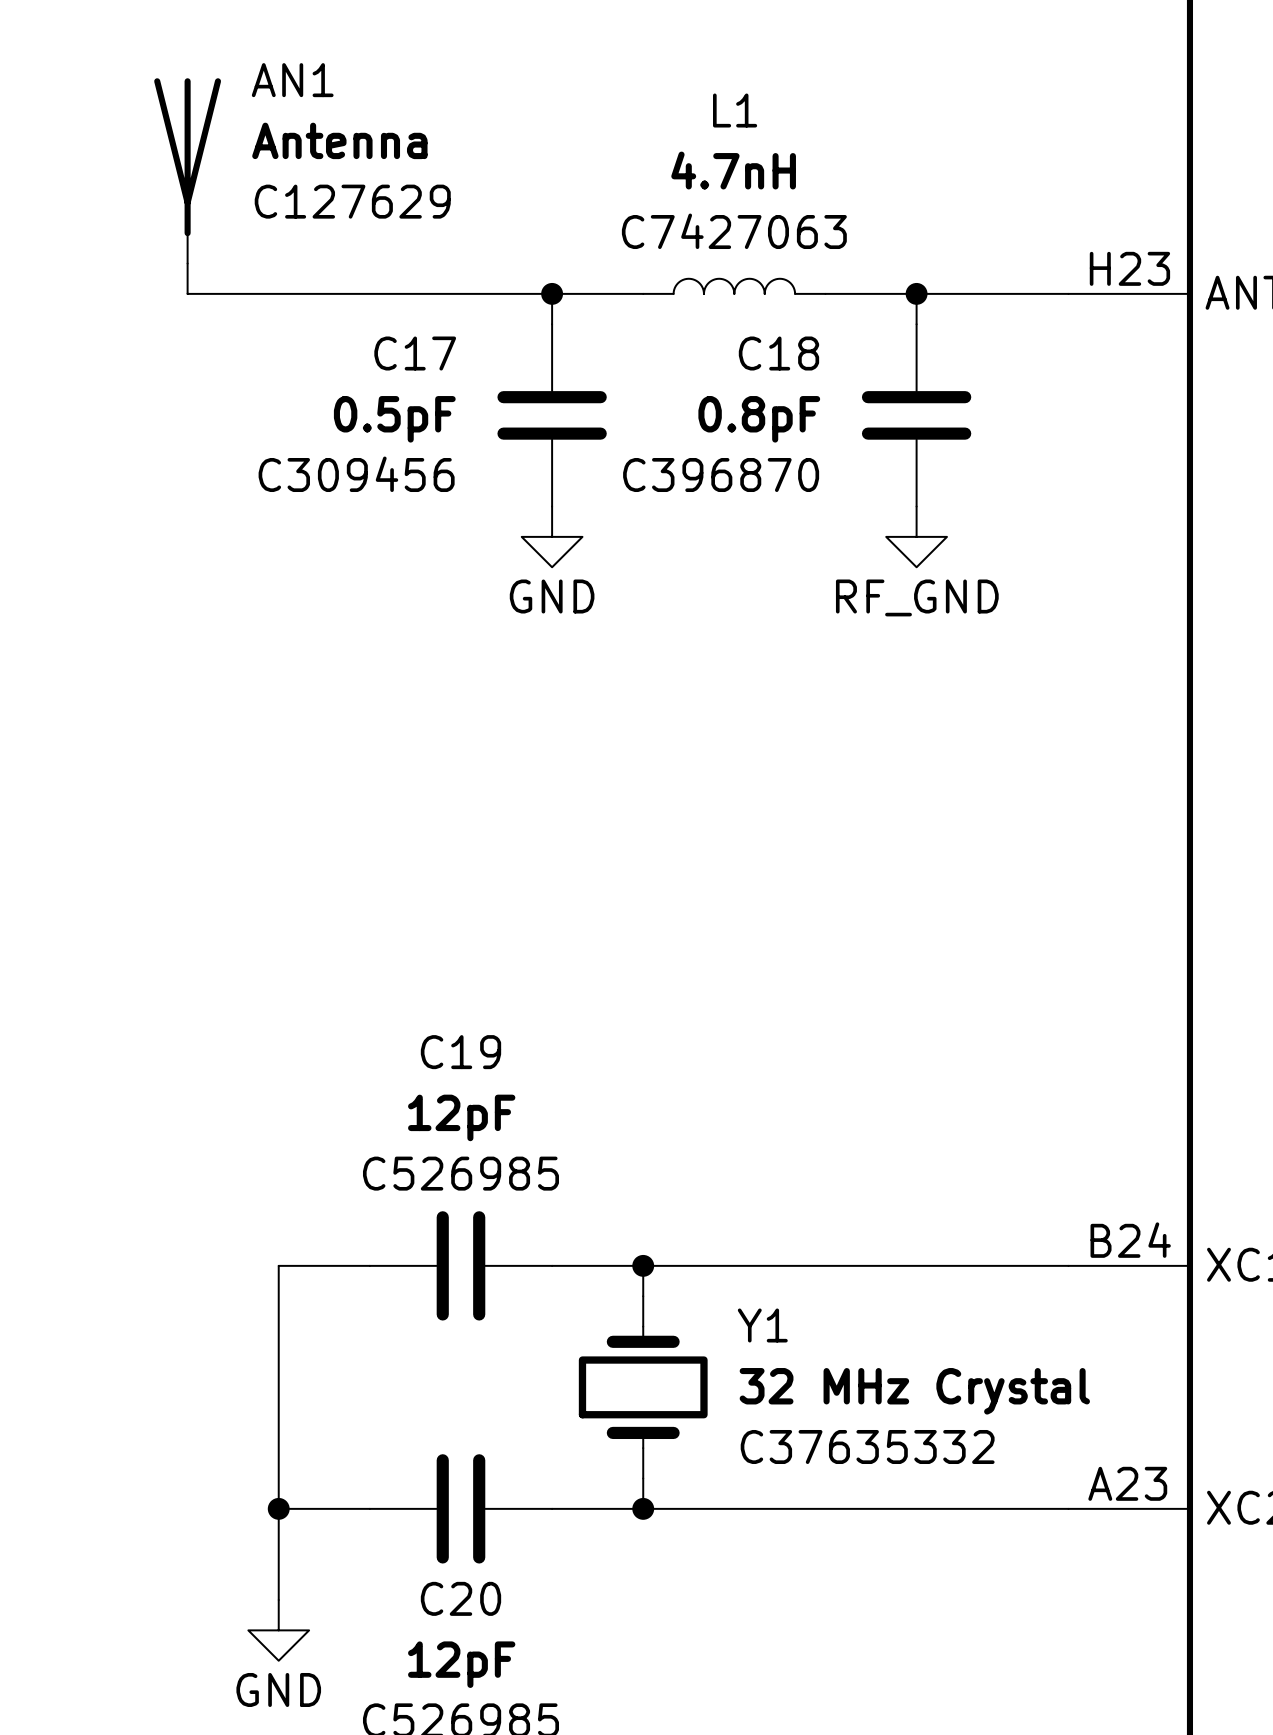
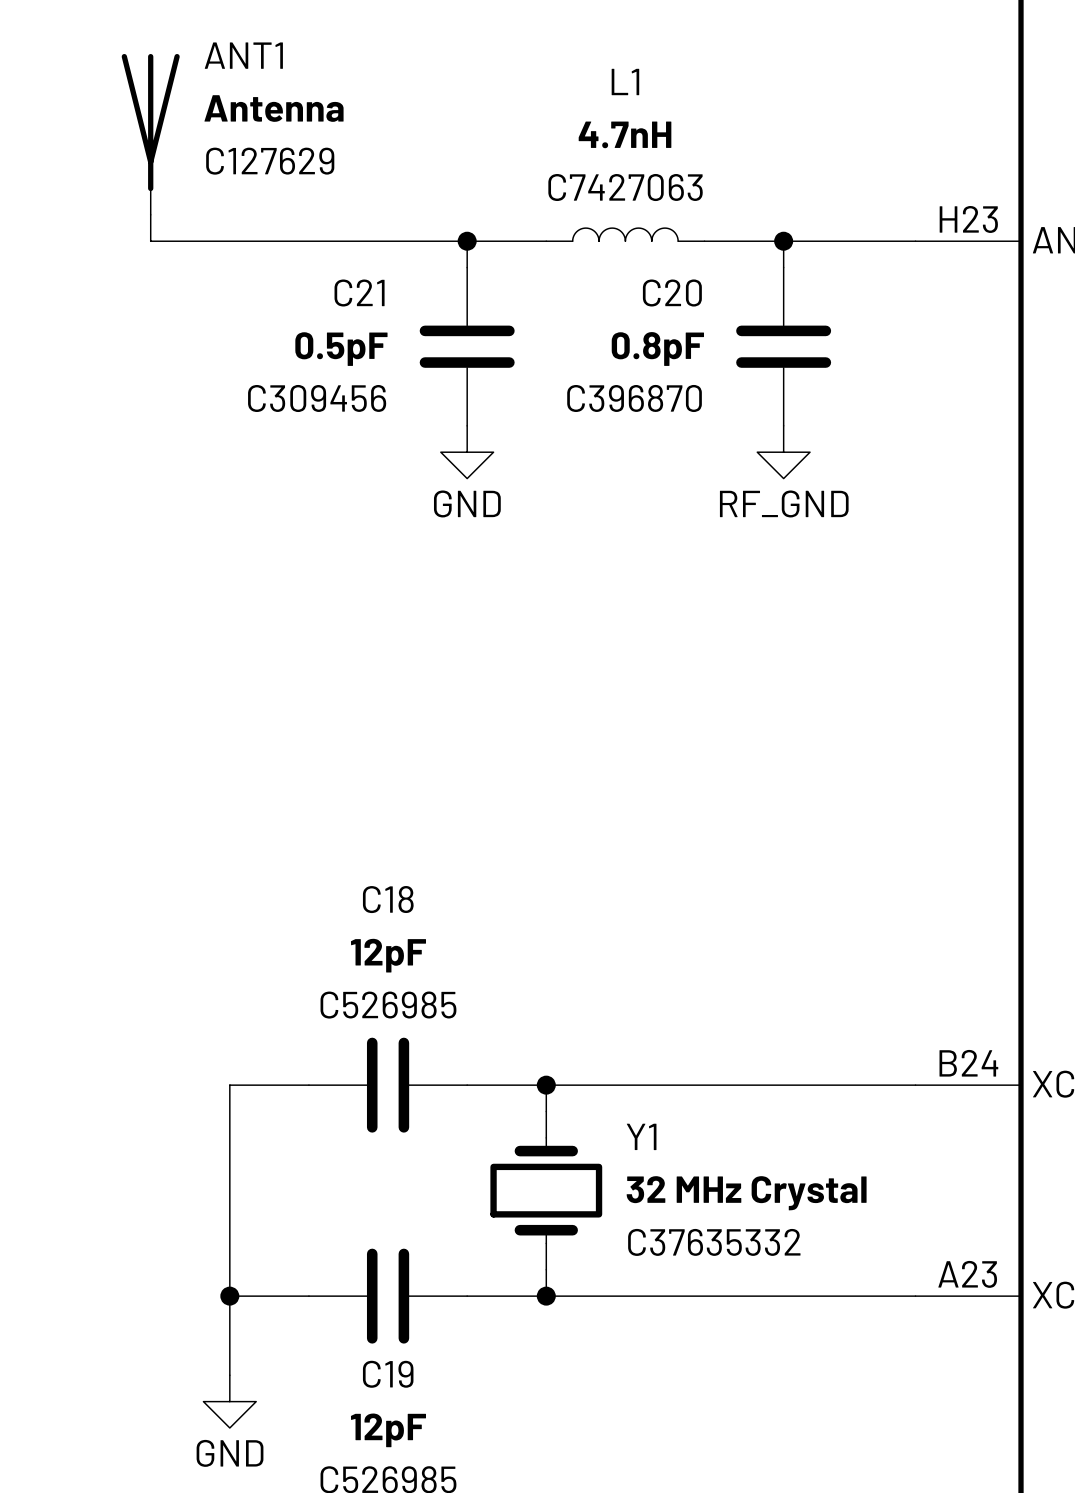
AN1 name: AN1 (292, 80) -> ANT1 (243, 55)
C17 name: C17 (415, 353) -> C21 (359, 293)
C18 name: C18 (778, 353) -> C20 (672, 293)
C19 name: C19 (460, 1052) -> C18 (388, 899)
C20 name: C20 (460, 1598) -> C19 (388, 1374)

